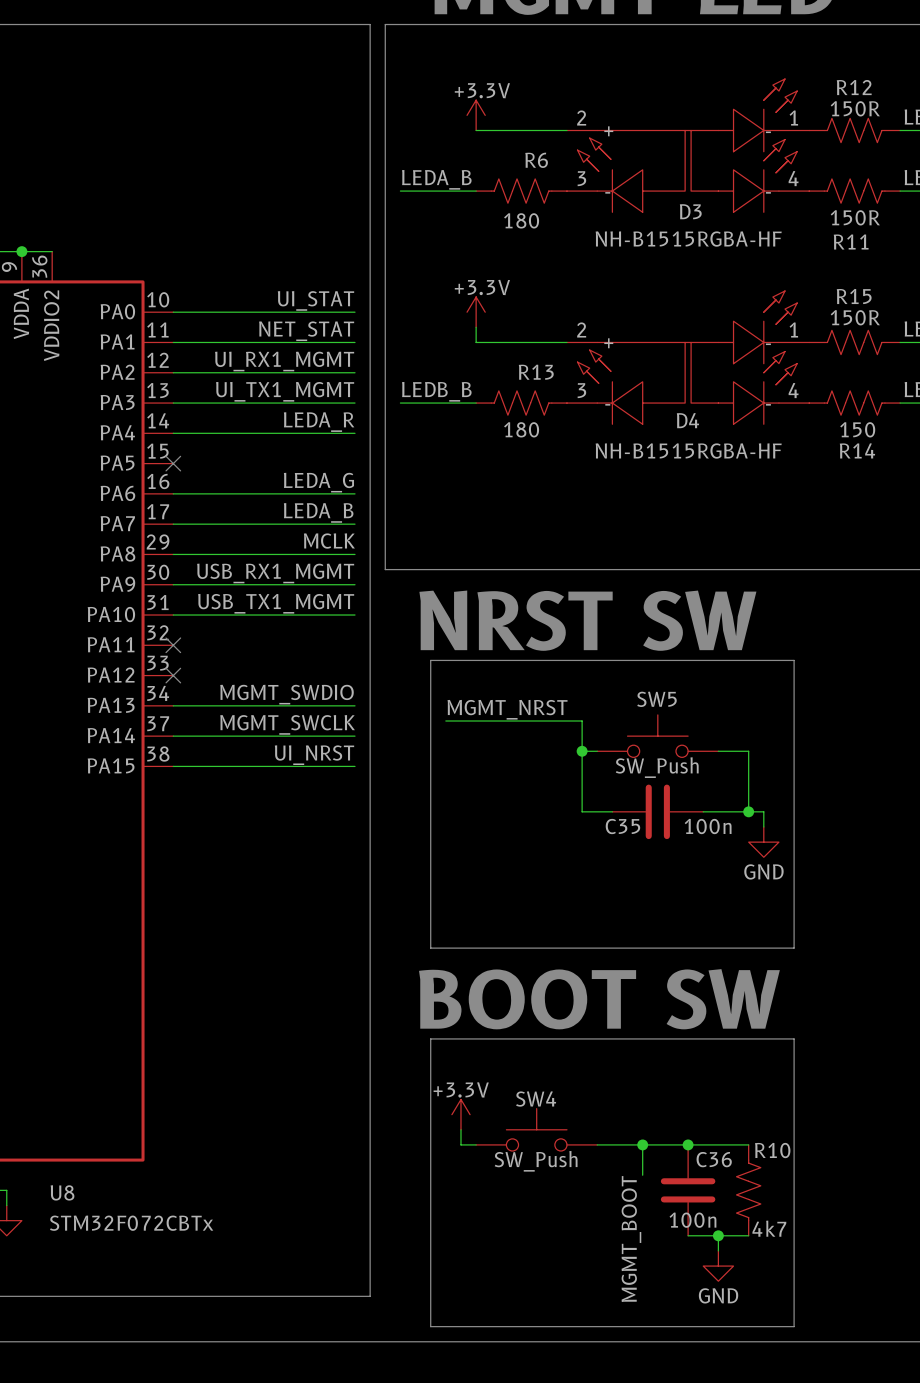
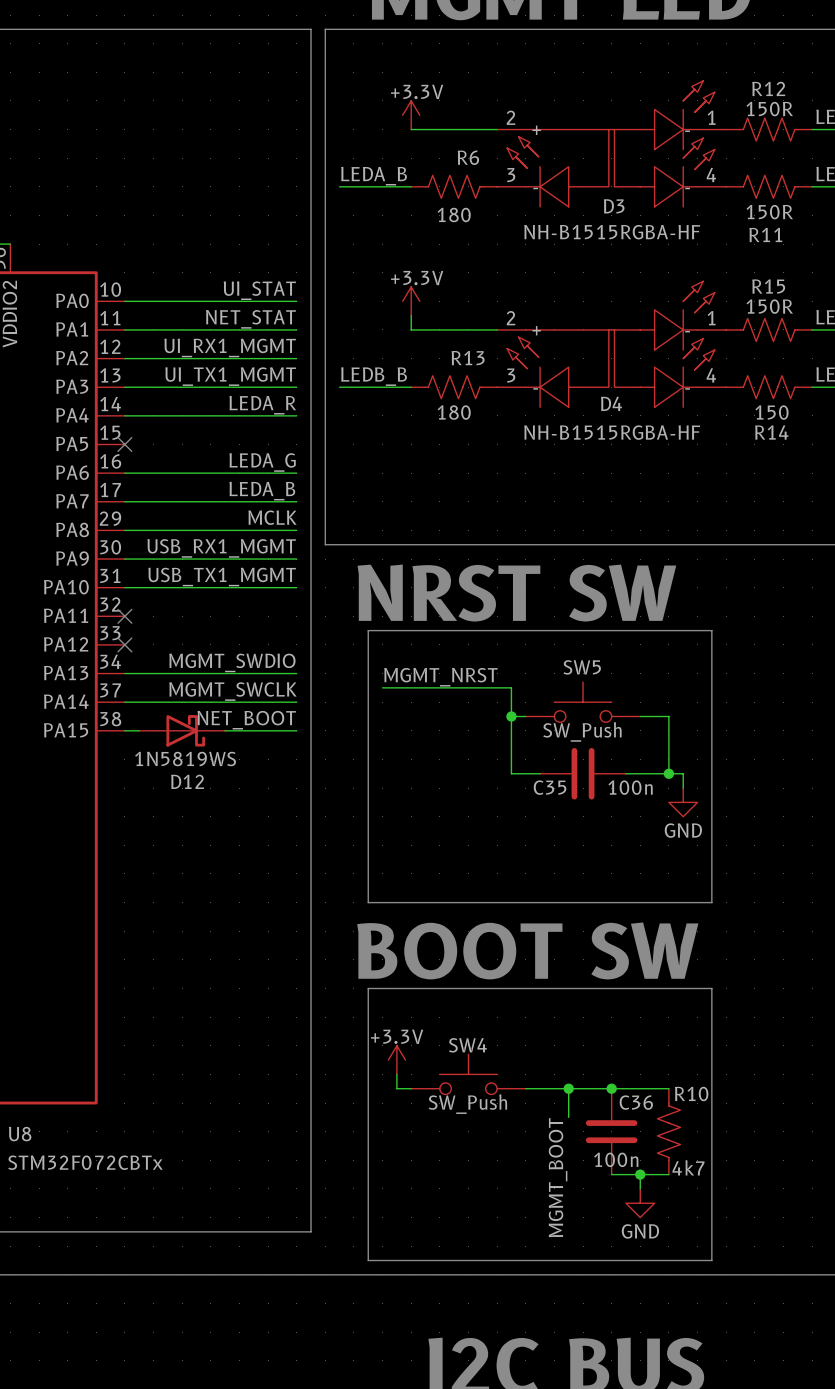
label: UI_NRST (314, 755) -> NET_BOOT (246, 720)
D12: none -> 1N5819WS (182, 730)

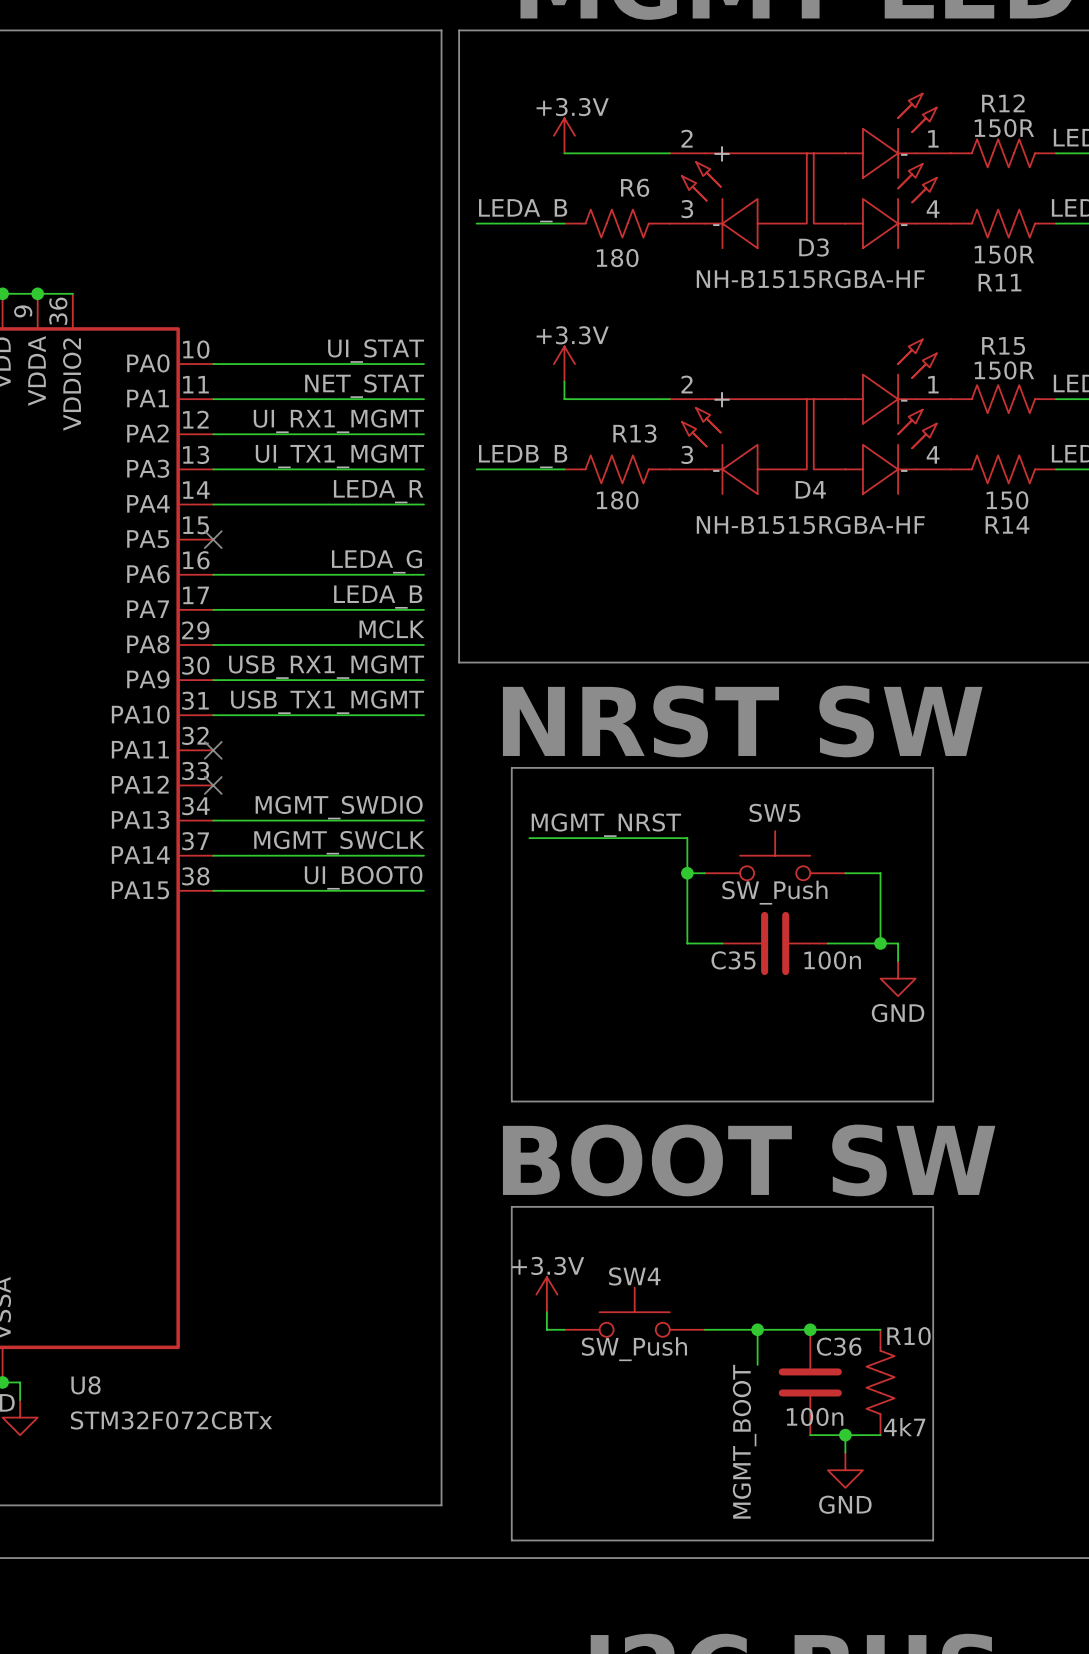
label: NET_BOOT (246, 720) -> UI_BOOT0 (363, 877)
D12: 1N5819WS (182, 730) -> none

